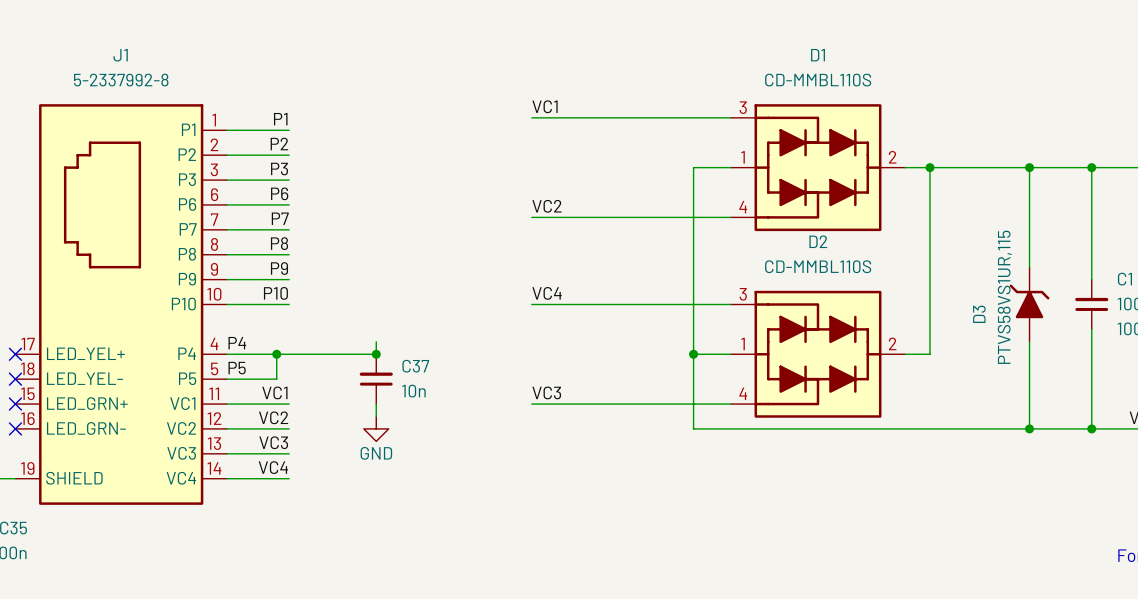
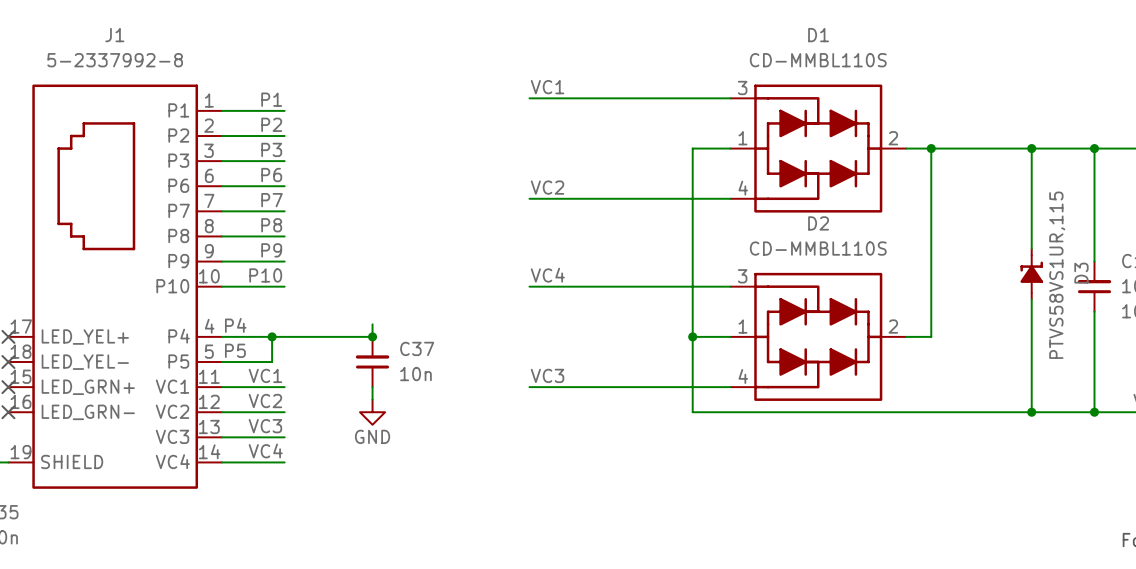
D3 symbol: [1009, 267, 1050, 342] -> [1020, 249, 1044, 300]
D3 value position: PTVS58VS1UR,115 (1004, 297) -> PTVS58VS1UR,115 (1057, 275)
D3 name position: D3 (979, 314) -> D3 (1081, 273)

